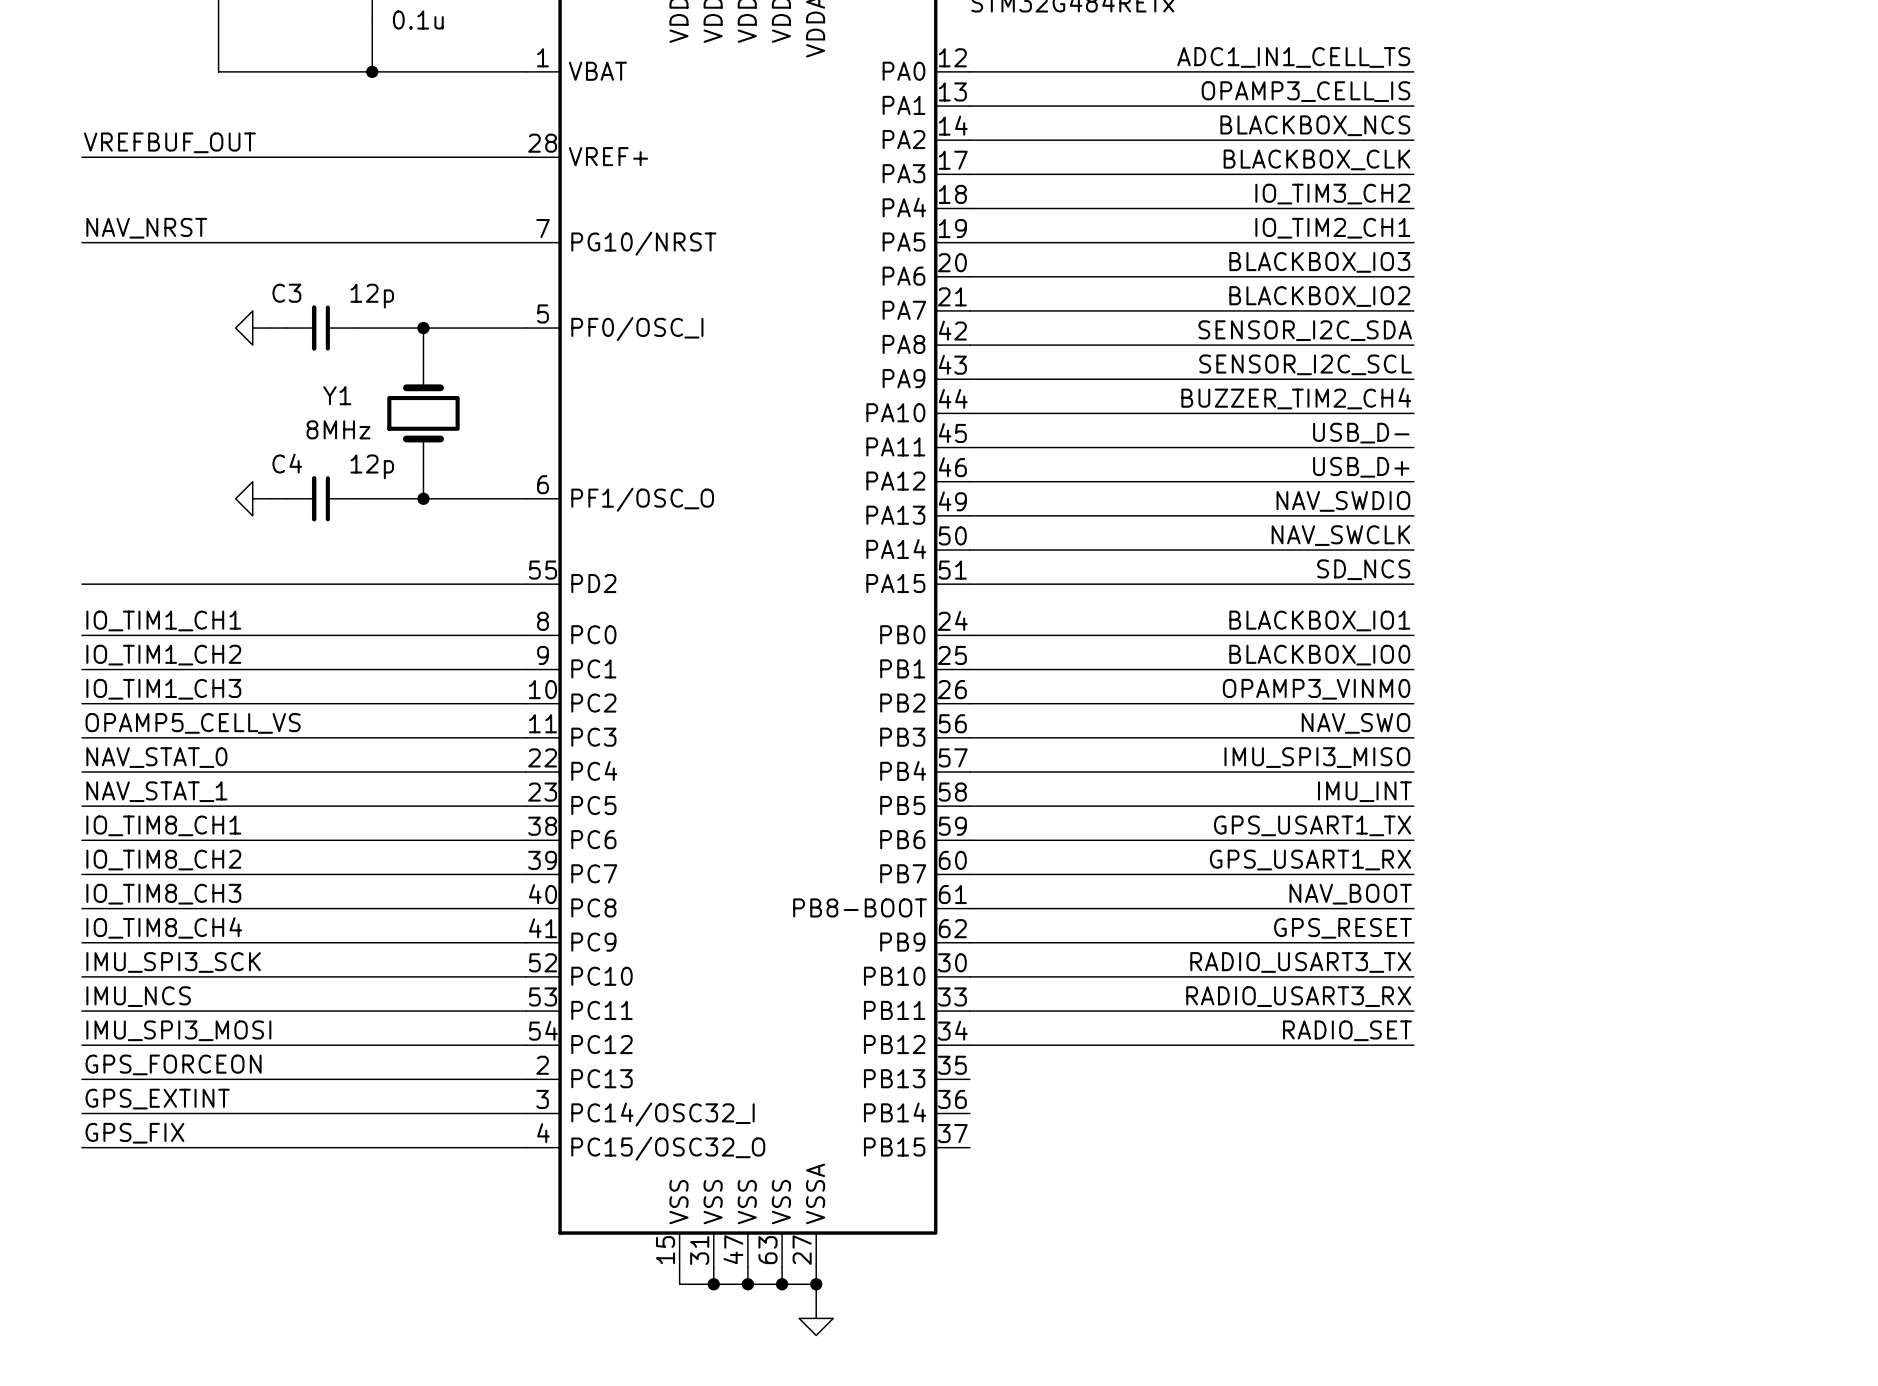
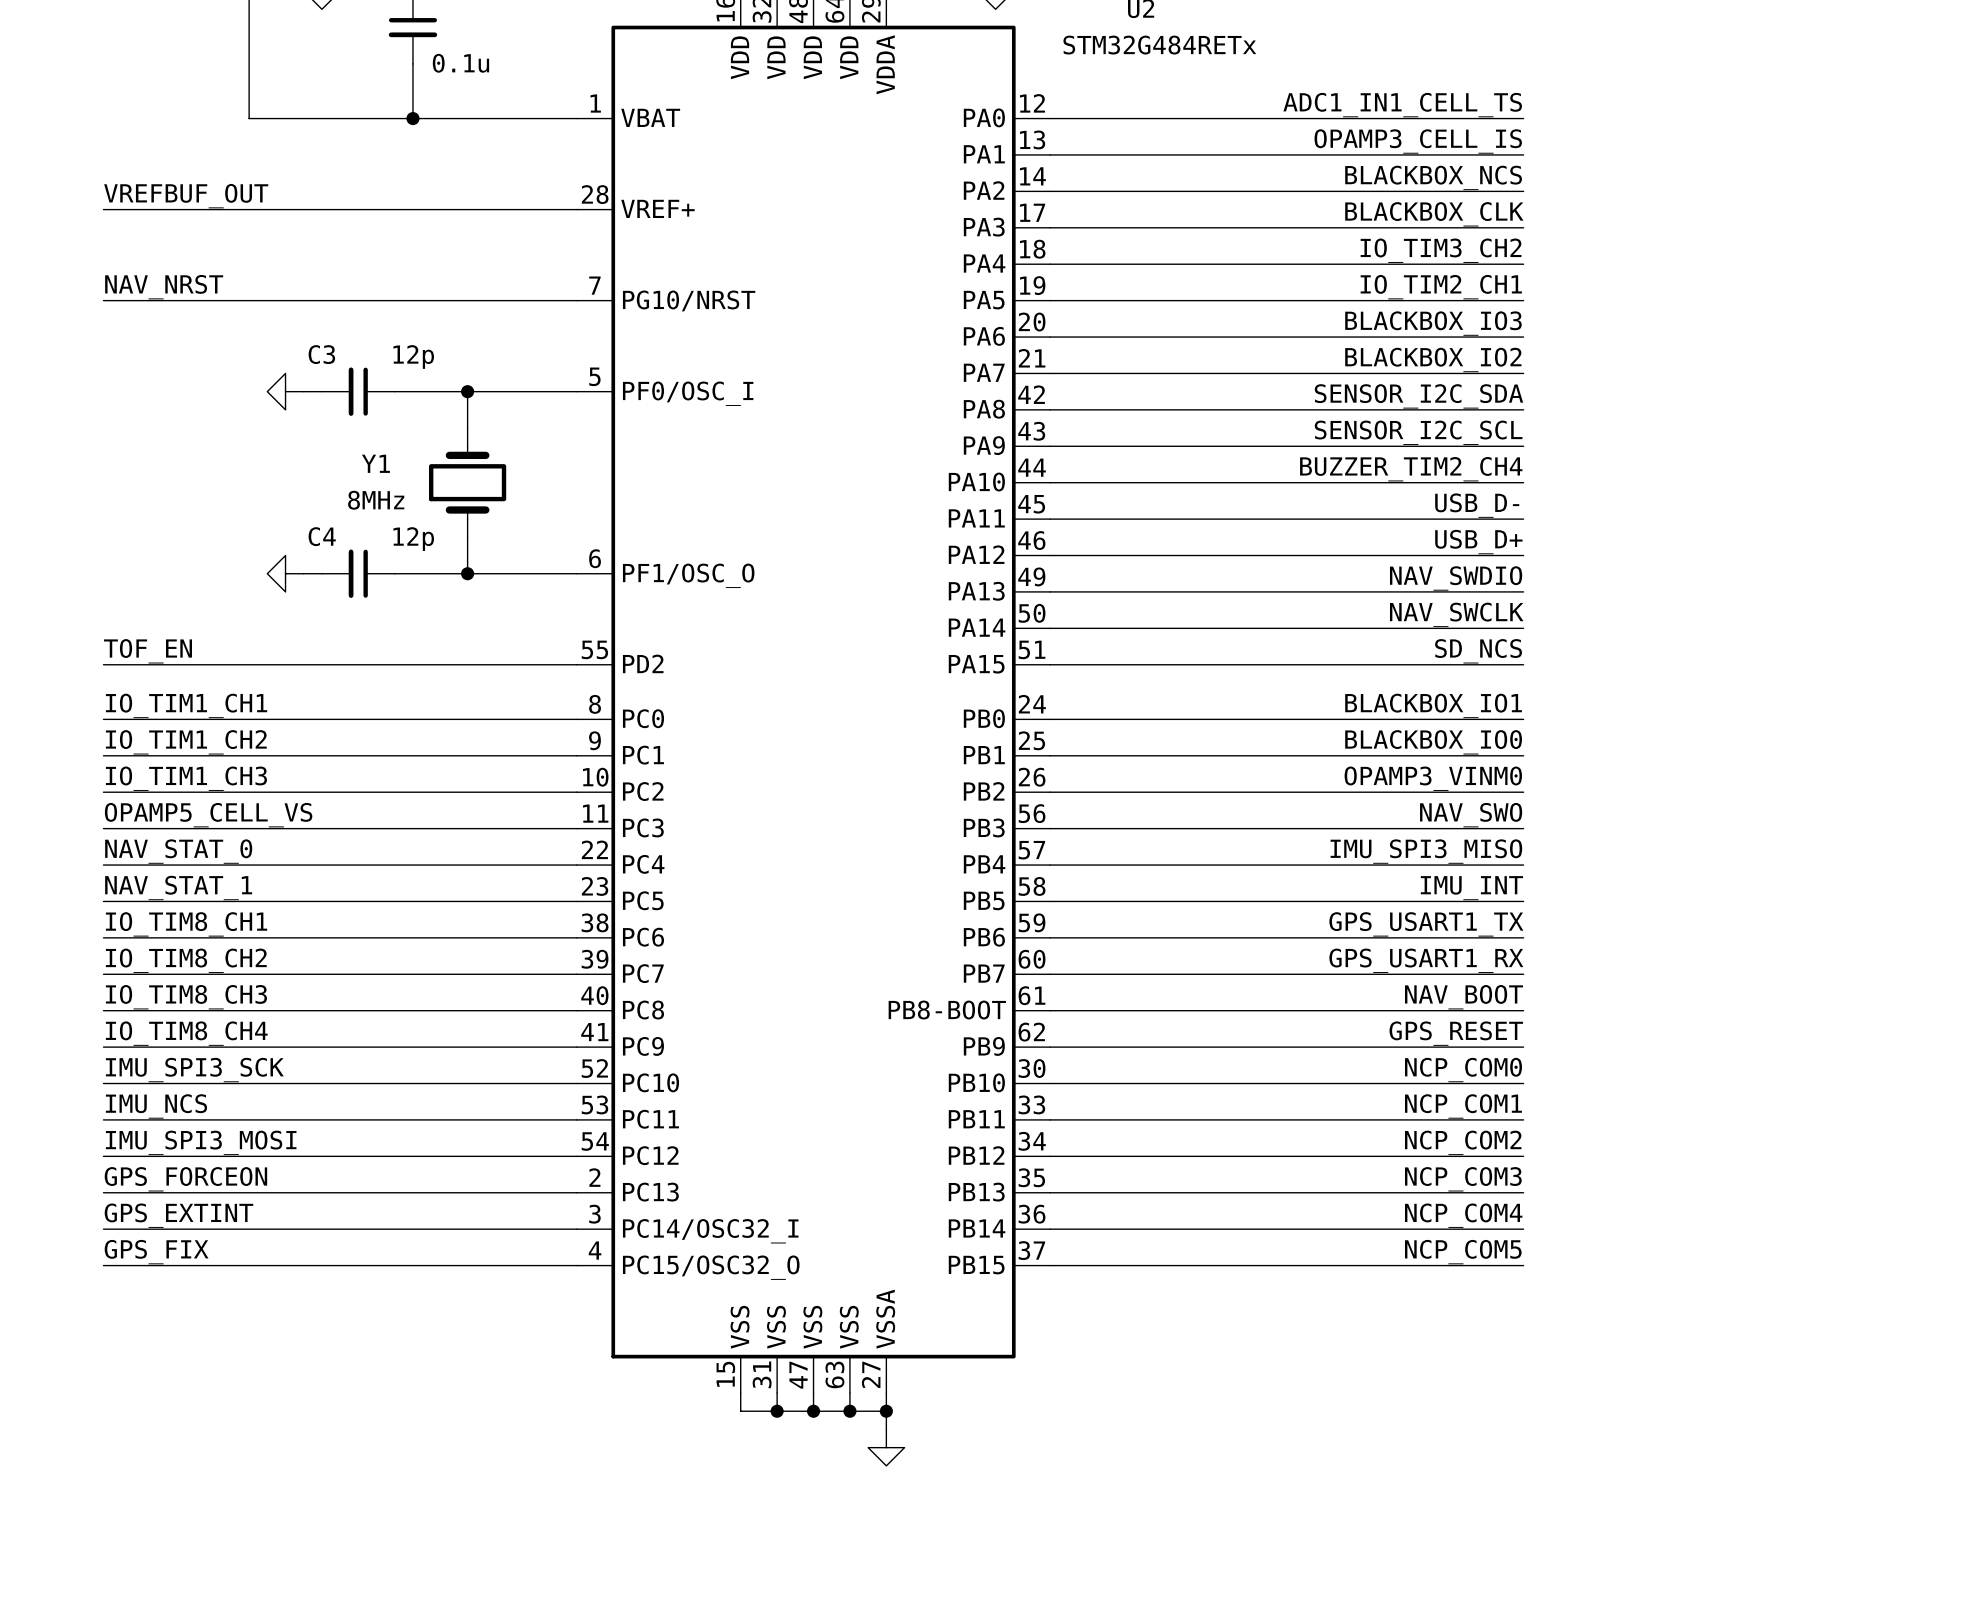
label: none -> TOF_EN (148, 651)
label: RADIO_USART3_TX (1300, 962) -> NCP_COM0 (1463, 1070)
label: RADIO_USART3_RX (1298, 996) -> NCP_COM1 (1463, 1106)
label: RADIO_SET (1347, 1030) -> NCP_COM2 (1463, 1142)
label: none -> NCP_COM3 (1463, 1179)
wire: none -> (1050, 1192) (1523, 1192)
label: none -> NCP_COM4 (1463, 1215)
wire: none -> (1050, 1229) (1523, 1229)
label: none -> NCP_COM5 (1463, 1252)
wire: none -> (1050, 1265) (1523, 1265)

